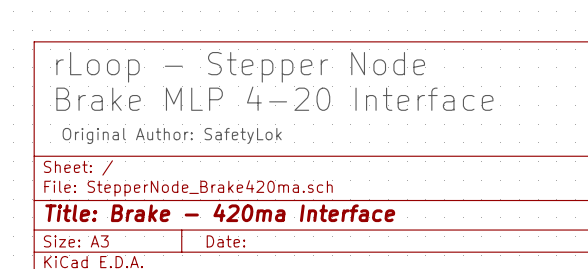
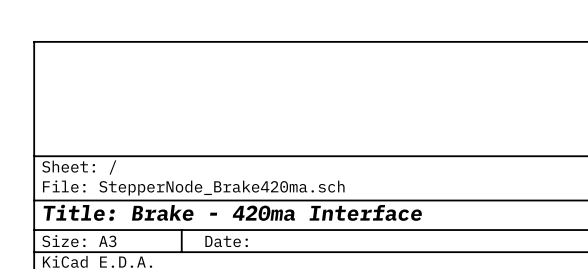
text: rLoop - Stepper Node (240, 67) -> none
text: Brake MLP 4-20 Interface (274, 98) -> none
text: Original Author: SafetyLok (172, 135) -> none

